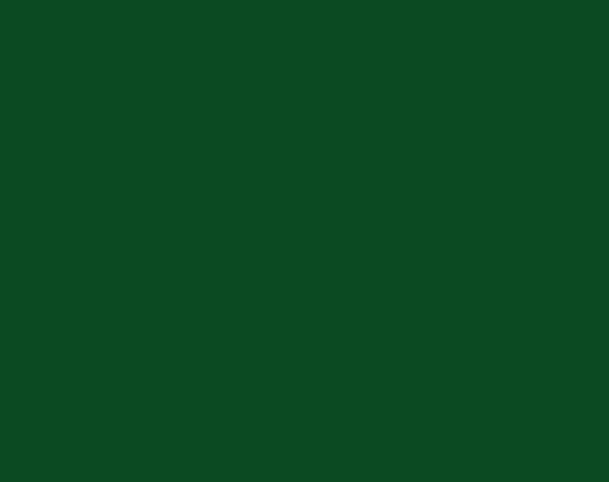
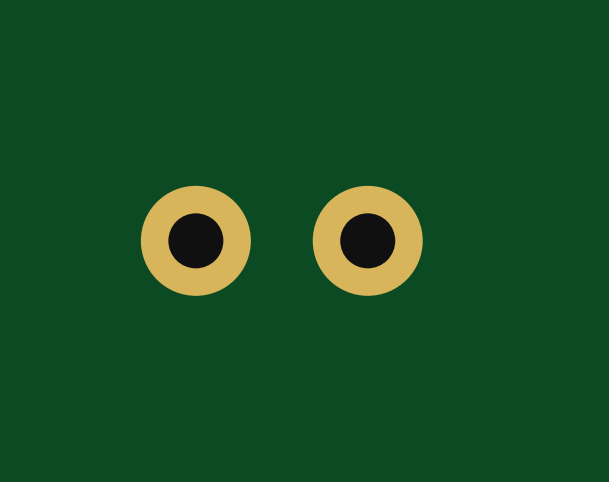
part: none -> (281, 240)

